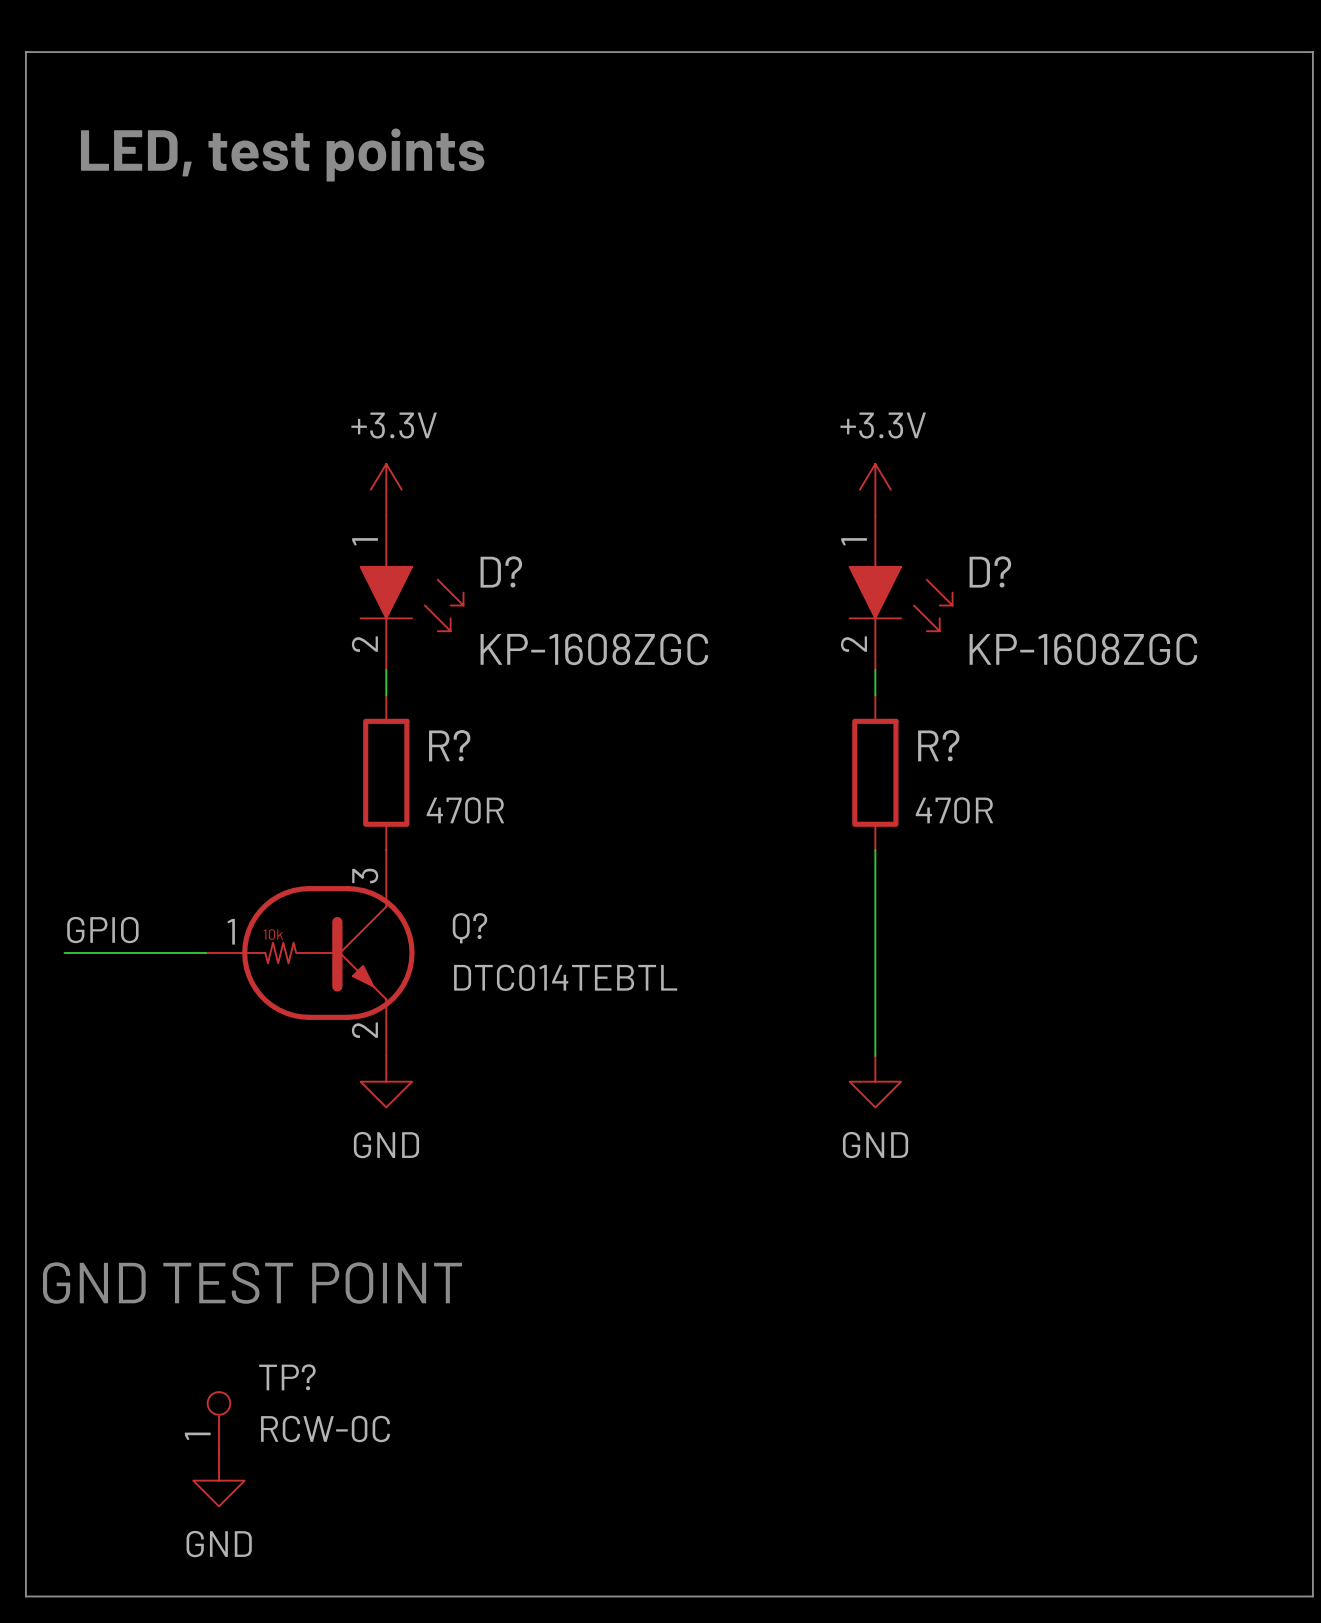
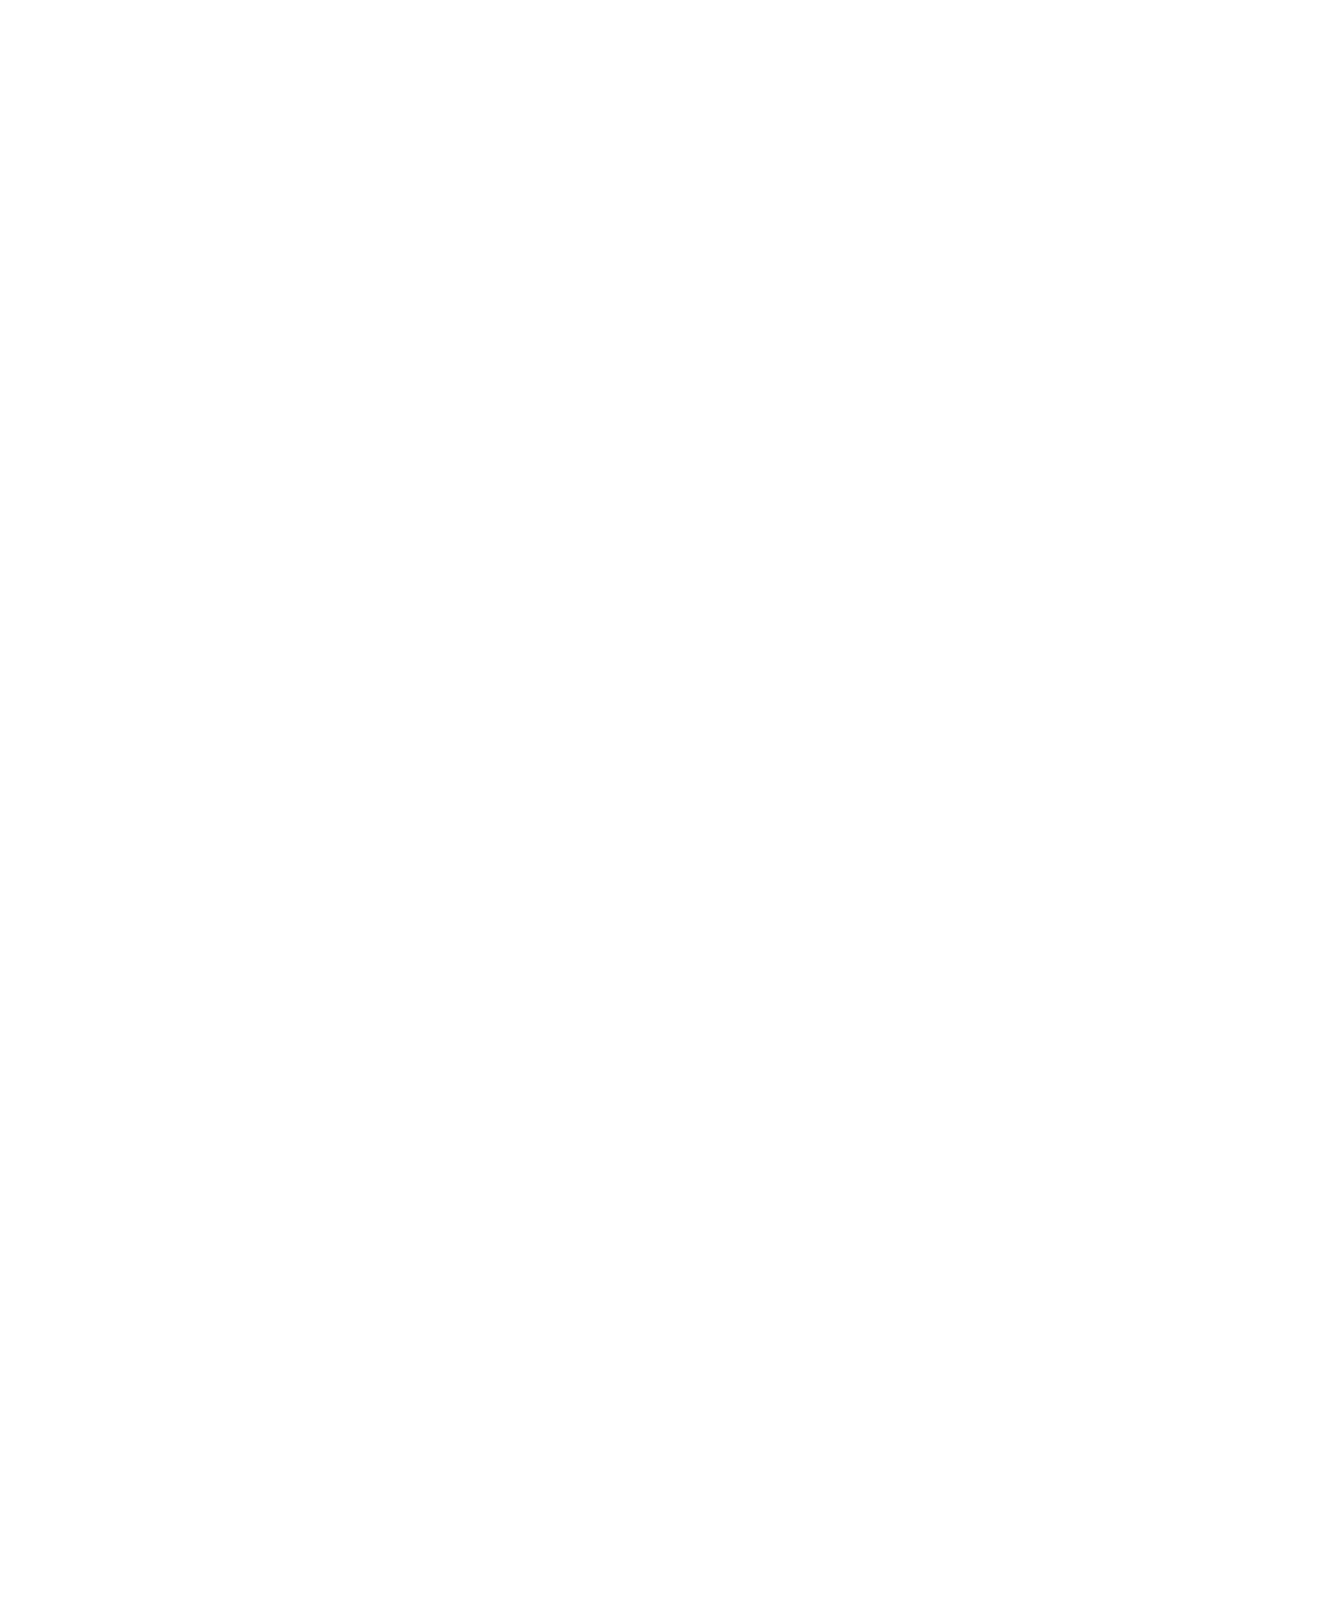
line: (25, 52) (1312, 52) (1312, 1596) (25, 1596) (25, 52) -> none
text: LED, test points (282, 155) -> none
power symbol: +3.3V (386, 489) -> none
power symbol: +3.3V (875, 489) -> none
D?: KP-1608ZGC (412, 592) -> none
D?: KP-1608ZGC (901, 592) -> none
wire: (386, 669) (386, 695) -> none
wire: (875, 669) (875, 695) -> none
R?: (386, 772) -> none
R?: (875, 772) -> none
wire: (875, 850) (875, 1055) -> none
label: GPIO (102, 930) -> none
wire: (64, 952) (206, 952) -> none
Q?: DTC014TEBTL (310, 952) -> none
power symbol: GND (386, 1081) -> none
power symbol: GND (875, 1081) -> none
text: GND TEST POINT (252, 1283) -> none
TP?: RCW-0C (218, 1423) -> none
power symbol: GND (218, 1480) -> none

